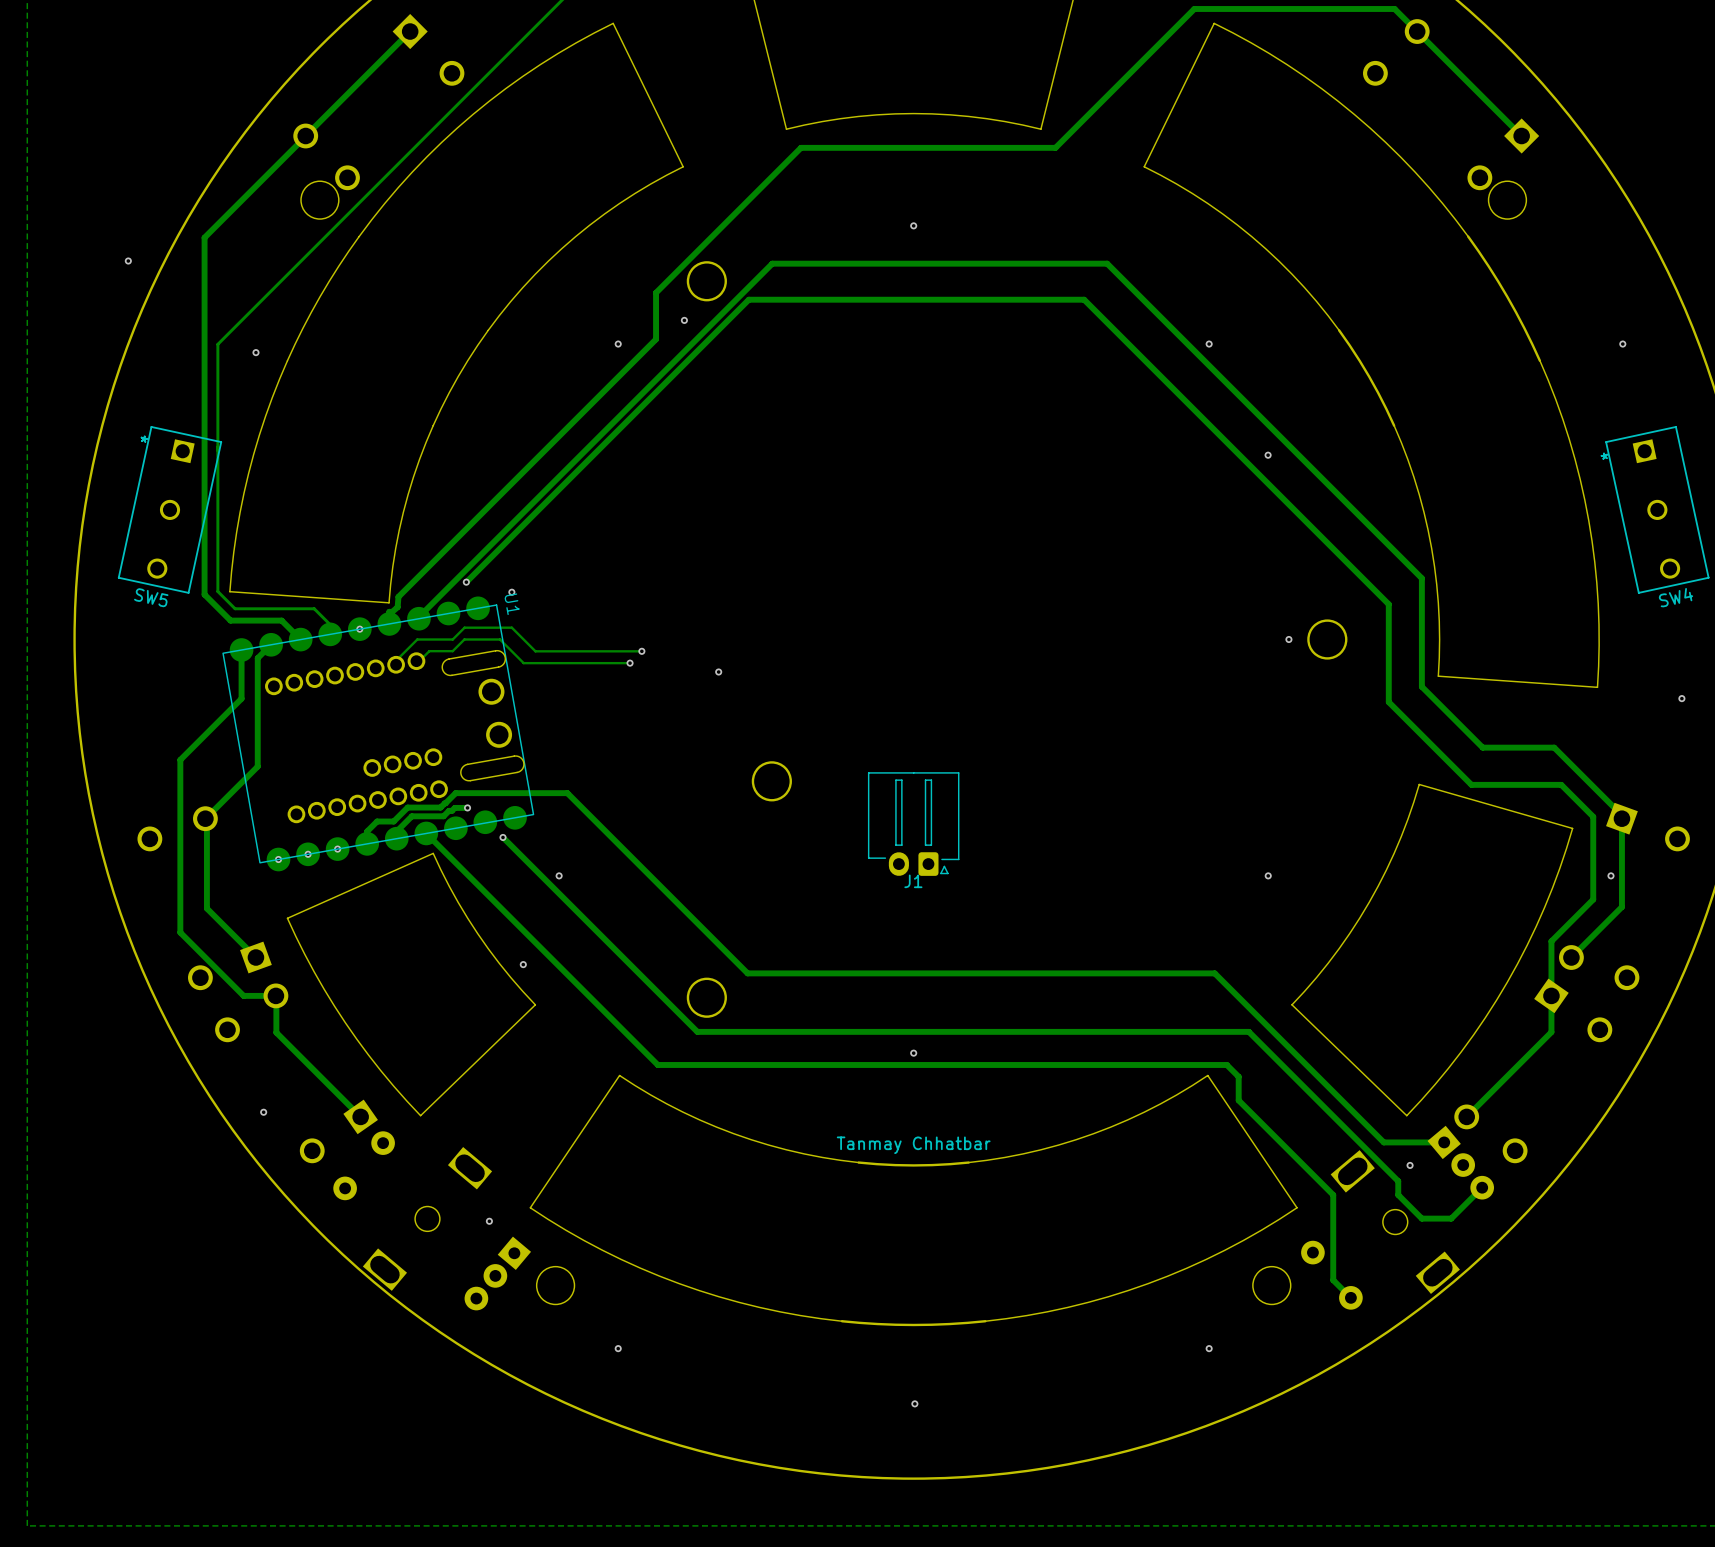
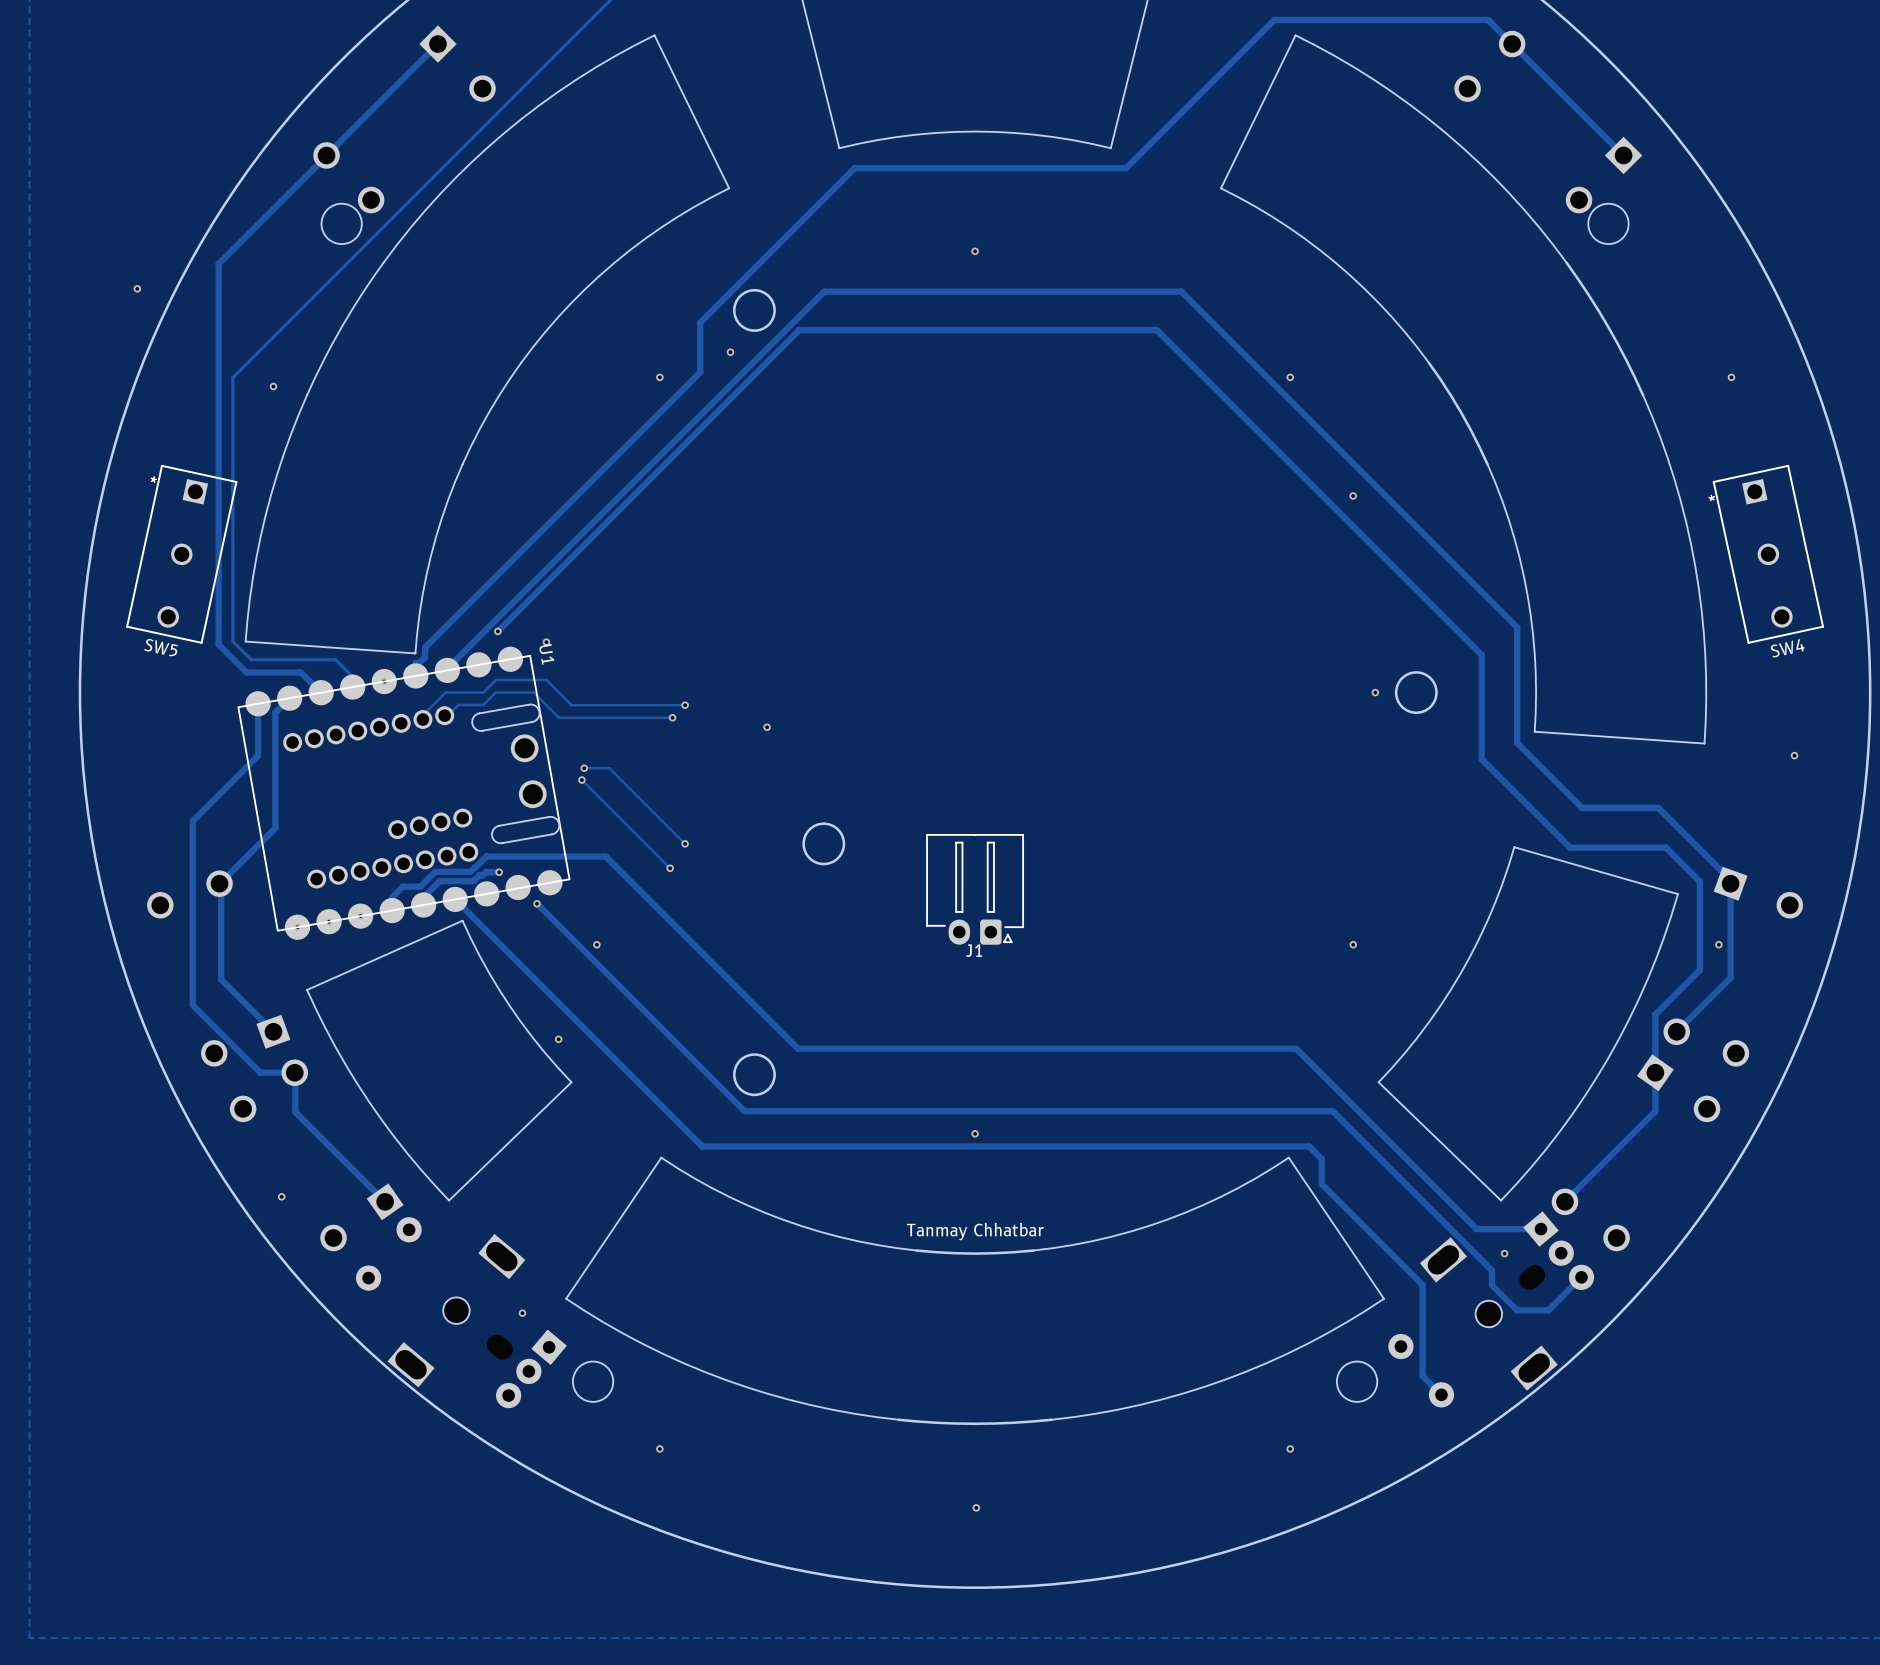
track: none -> (584, 768) (609, 768) (685, 843)
via: none -> (584, 768)
track: none -> (581, 780) (670, 868)
via: none -> (581, 780)
via: none -> (685, 843)
via: none -> (670, 868)

